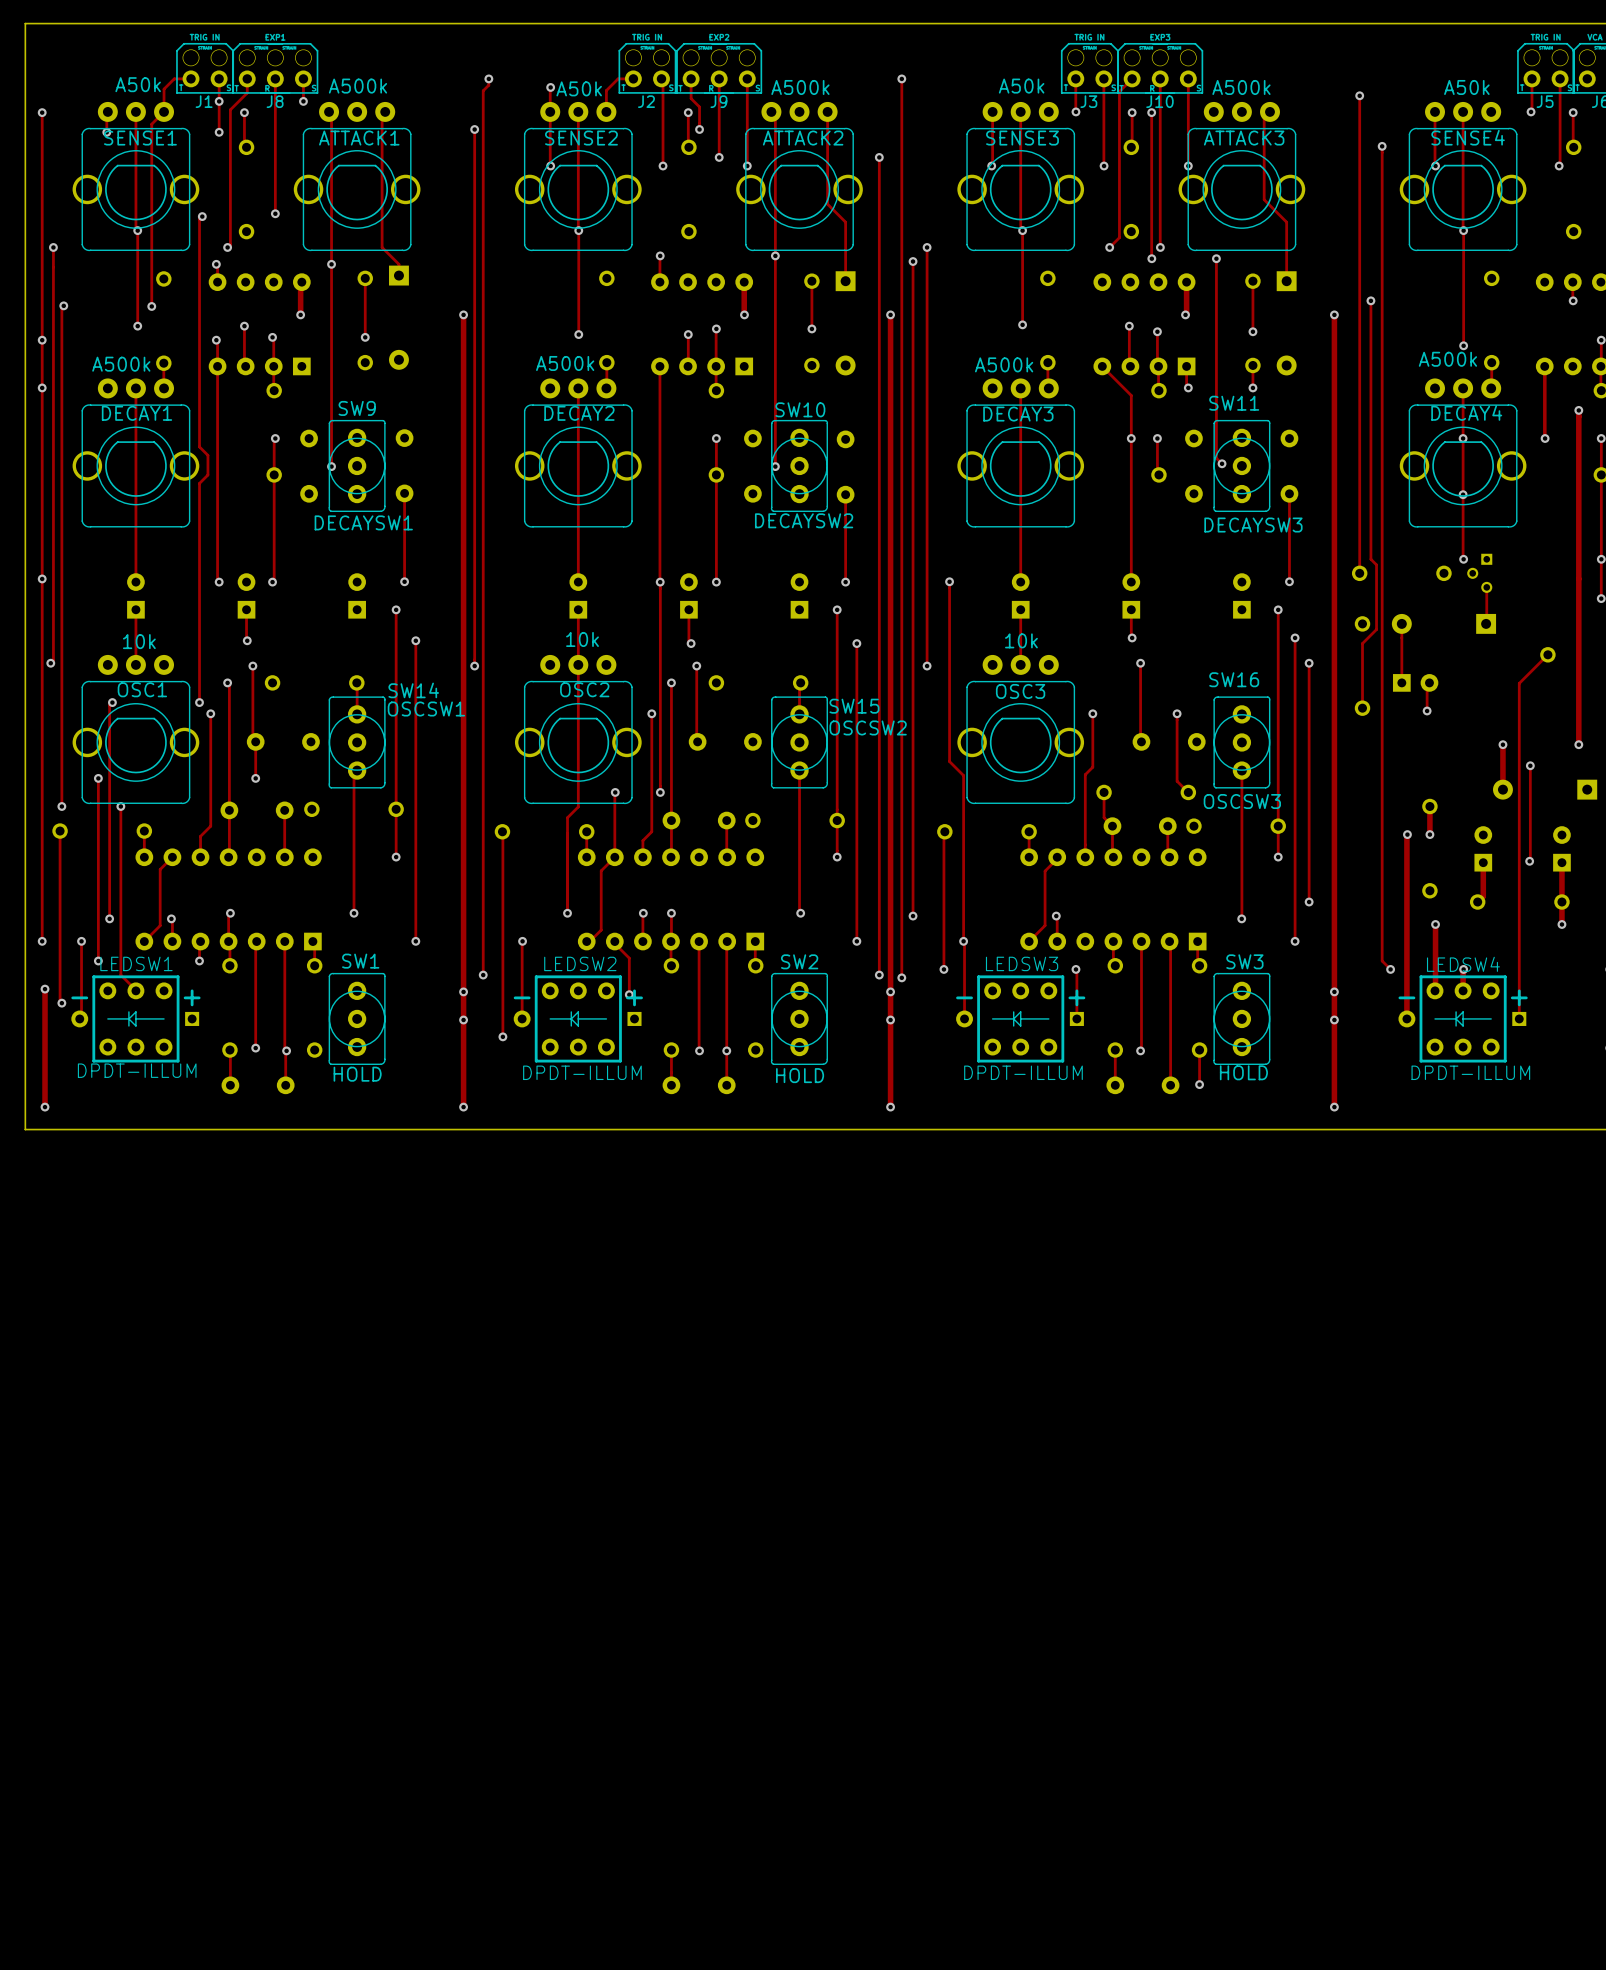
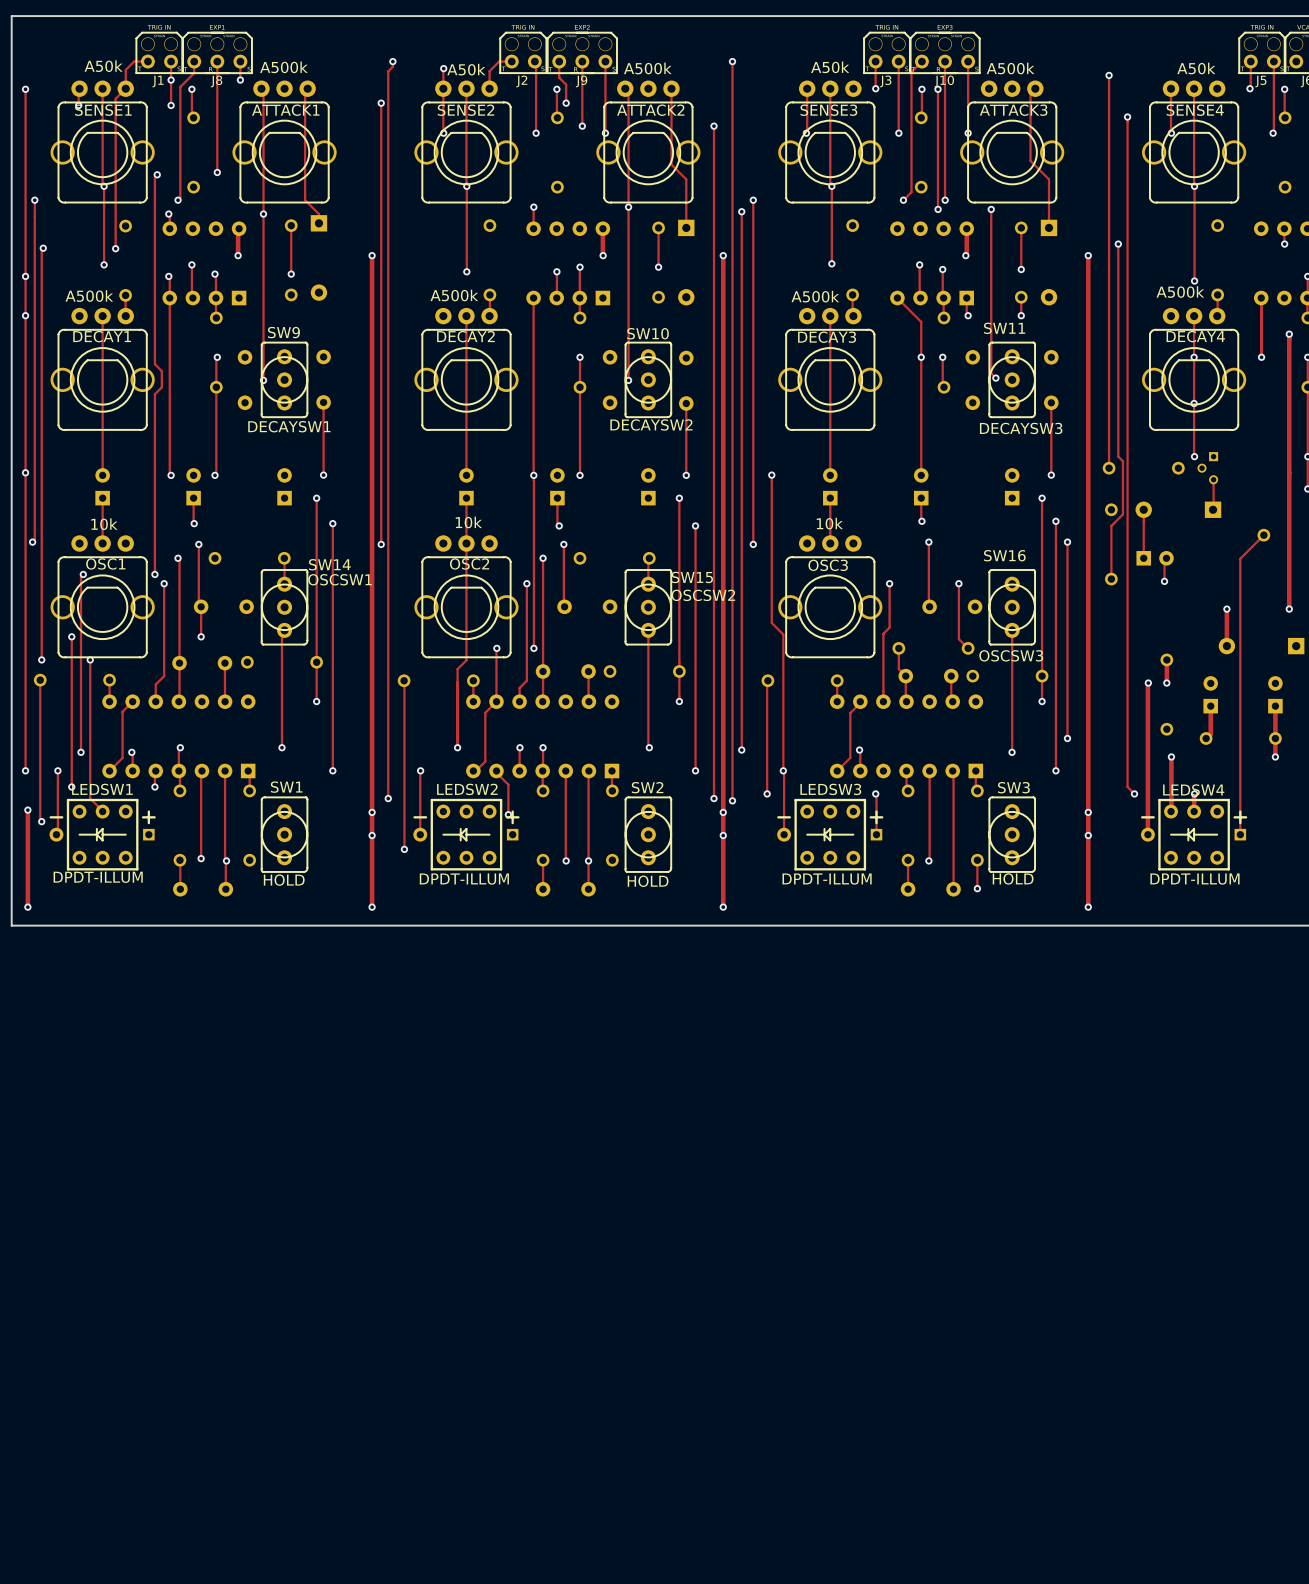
track: (1530, 765) (1529, 861) -> none
via: (1530, 765) -> none
via: (1529, 861) -> none

